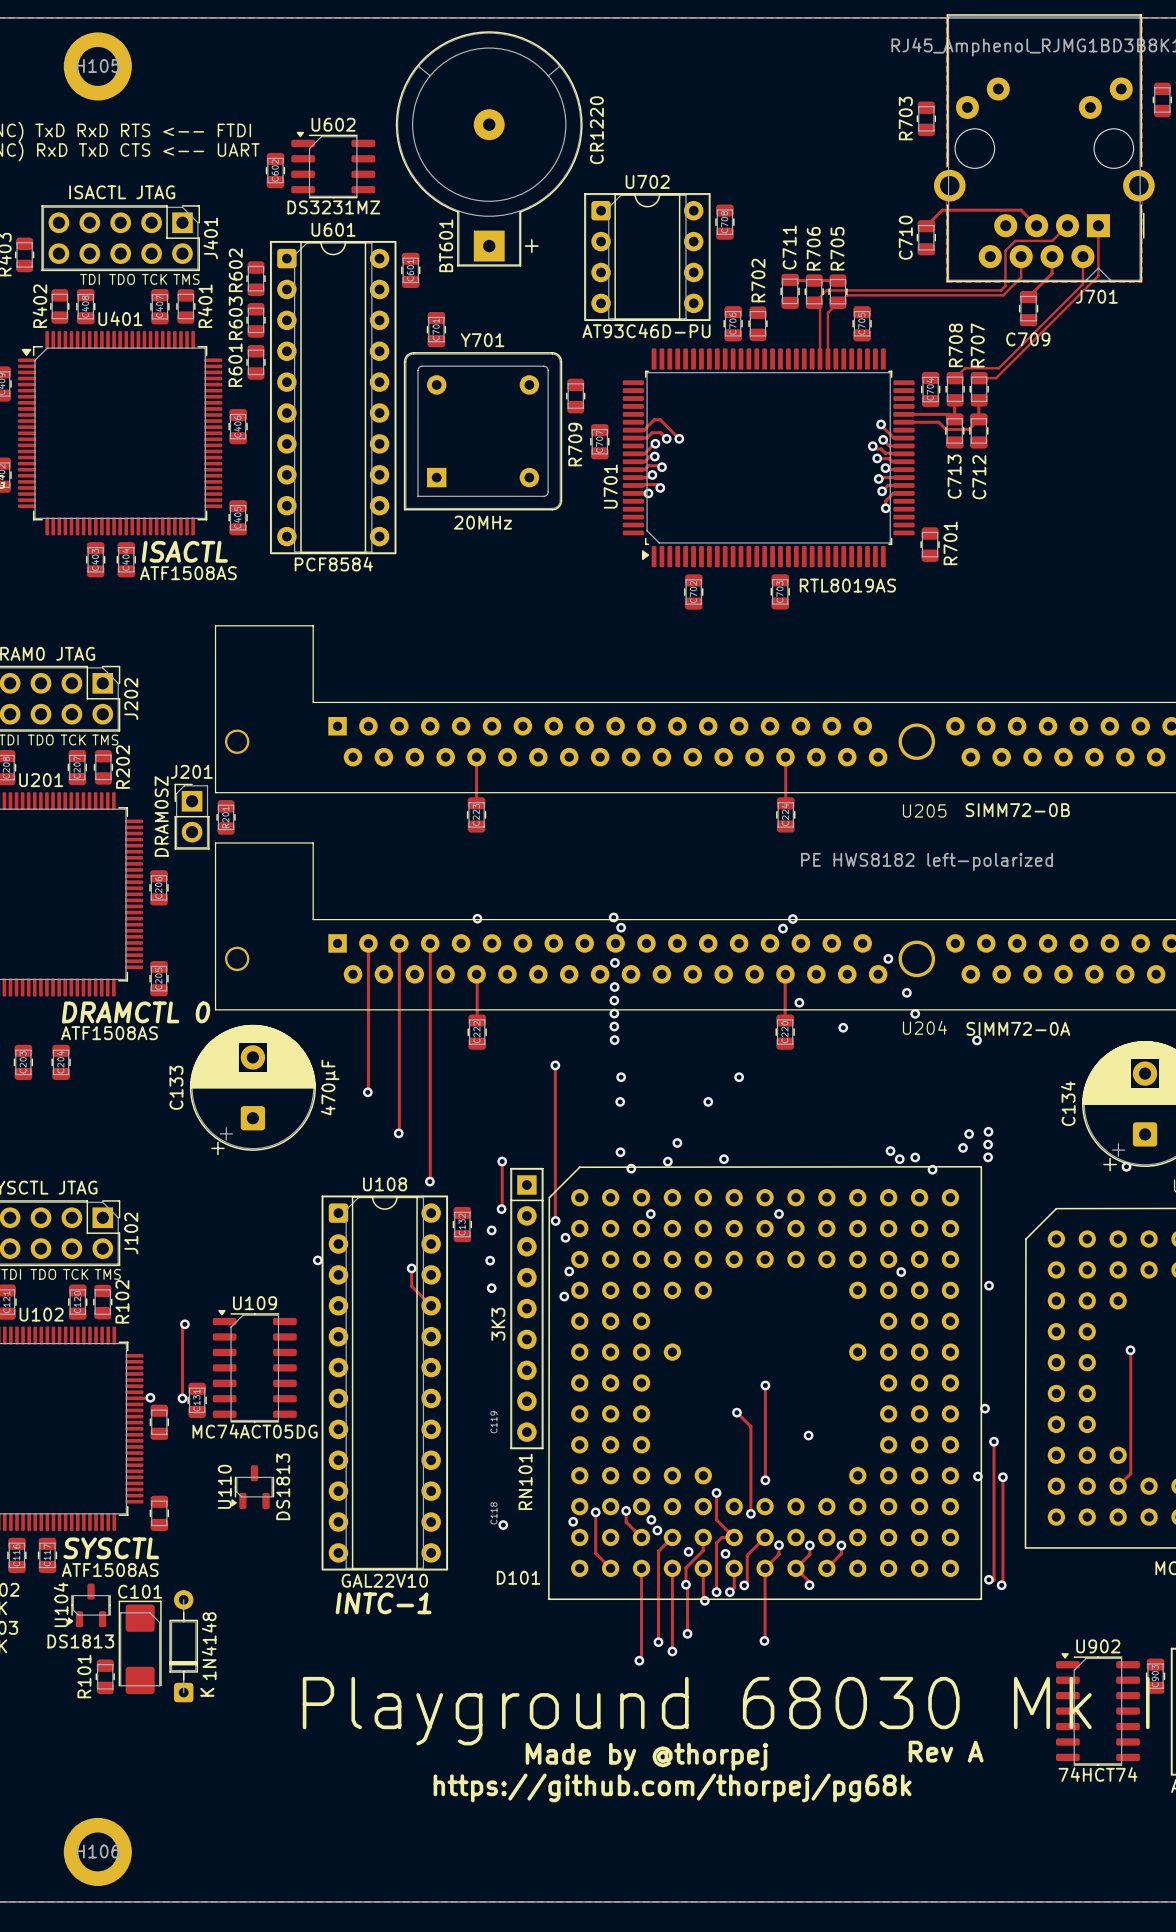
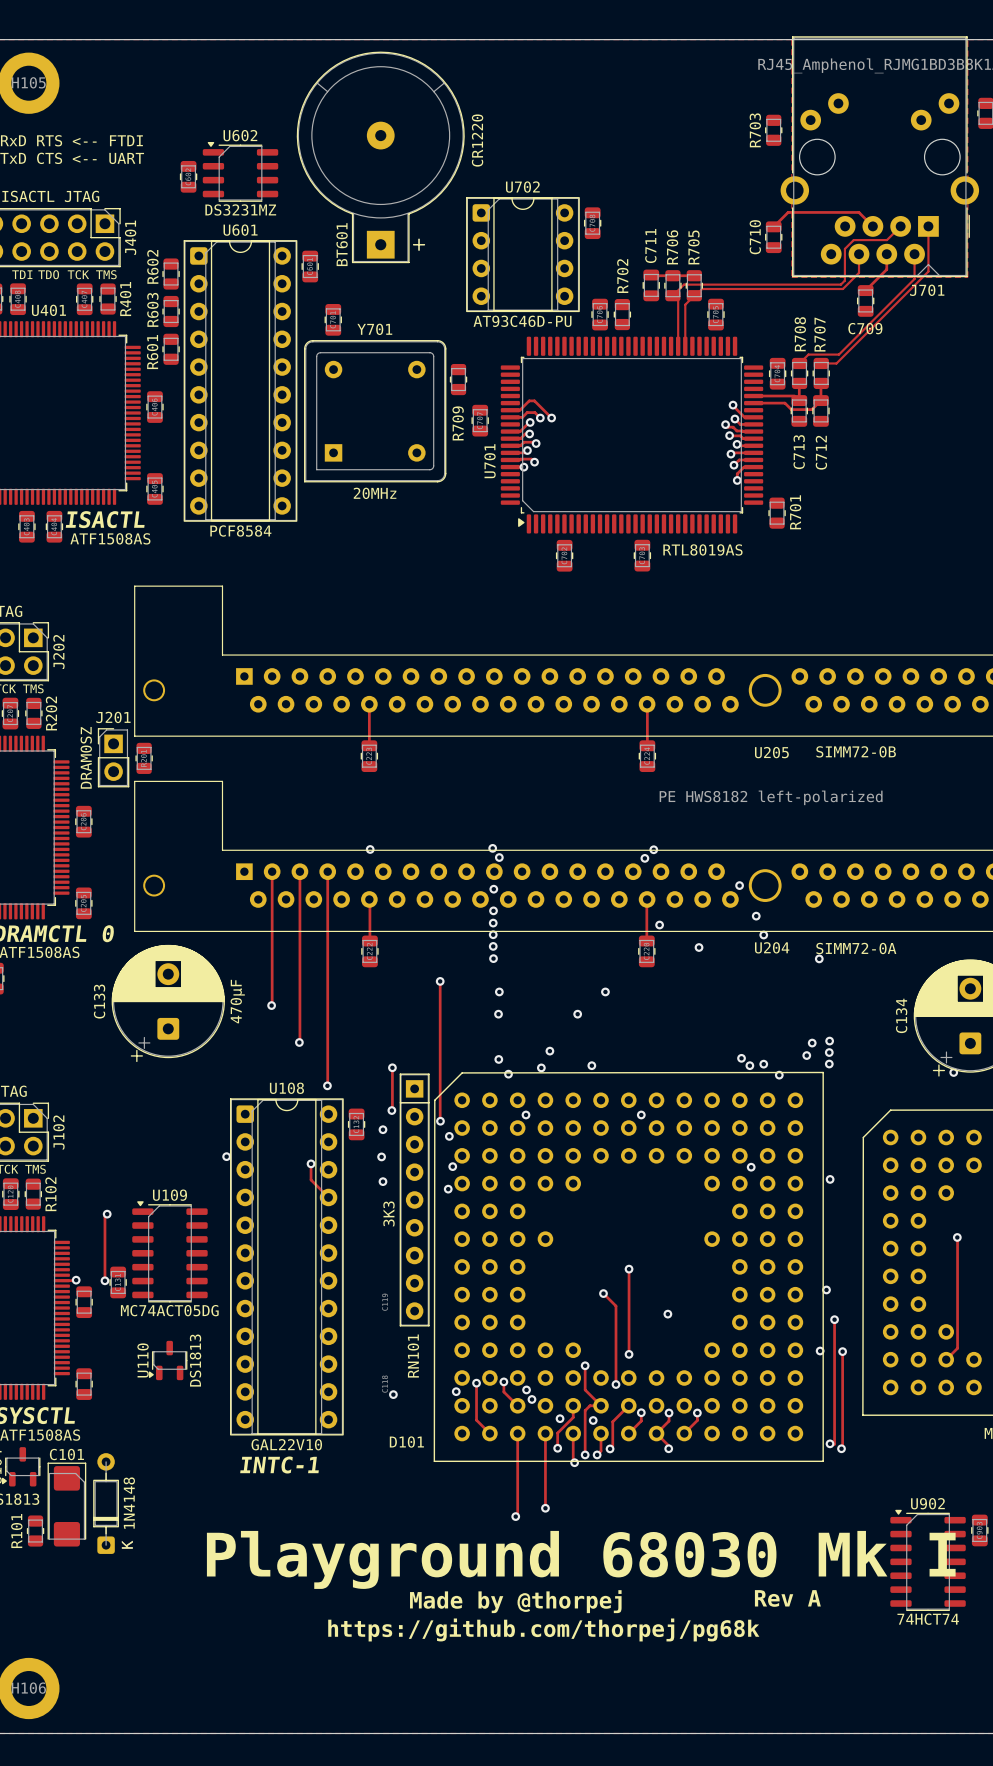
track: (672, 1537) (658, 1551) (658, 1642) -> none
track: (765, 1568) (764, 1640) -> none
track: (686, 1584) (687, 1633) -> none
via: (687, 1633) -> none
via: (764, 1640) -> none
via: (658, 1642) -> none

